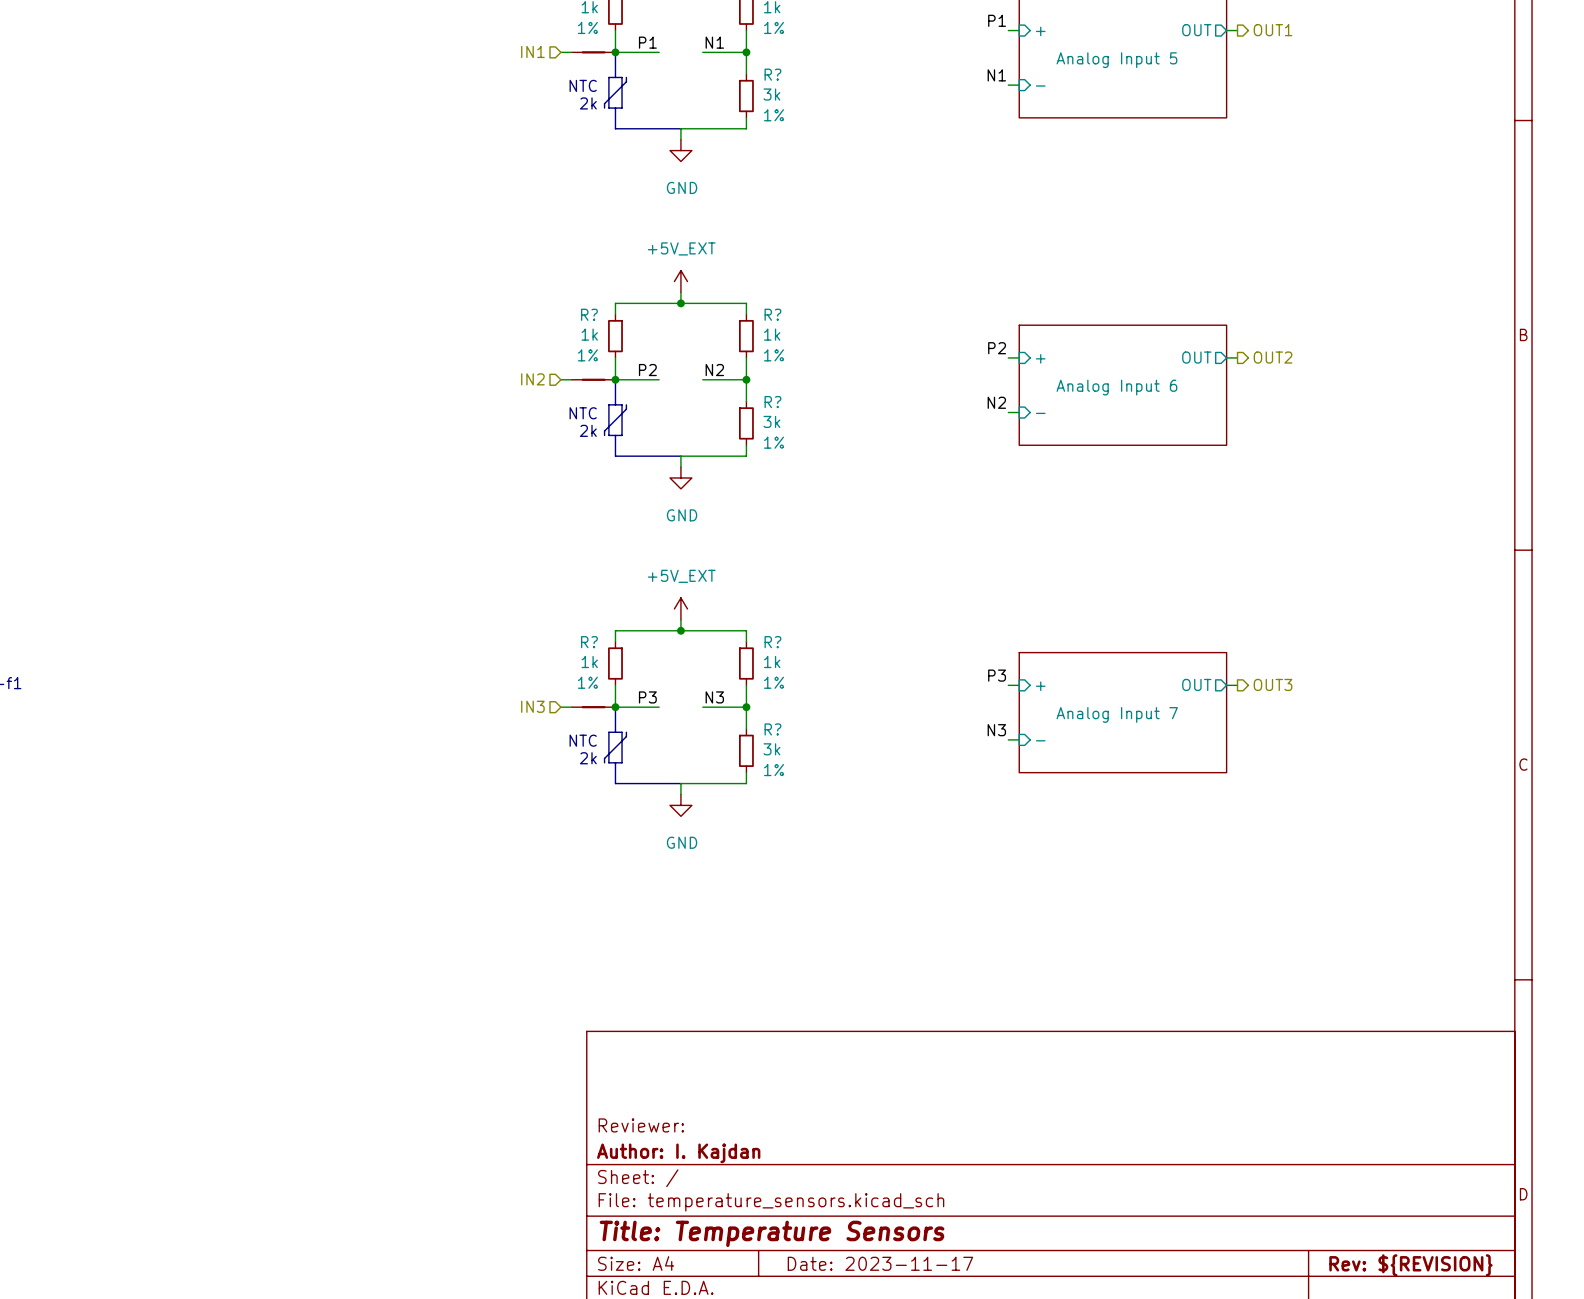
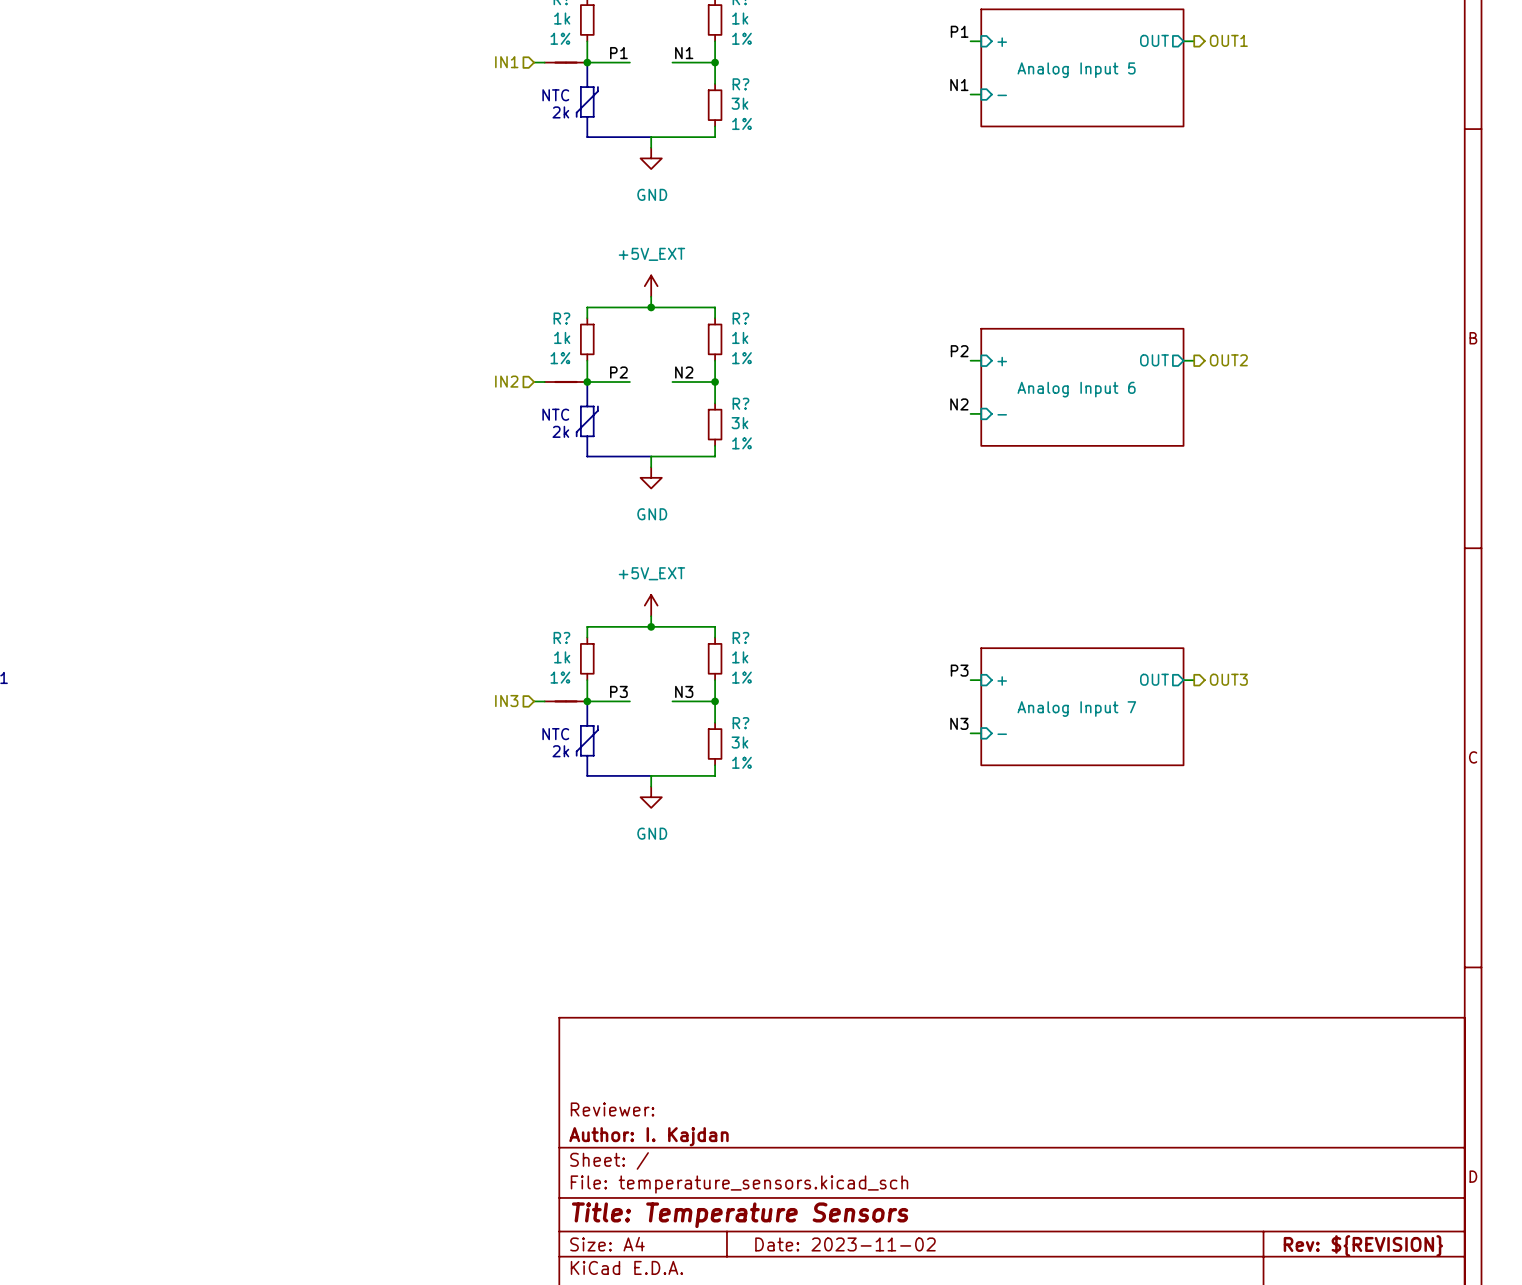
title block: Date: 2023-11-17 (880, 1263) -> Date: 2023-11-02 (845, 1244)

